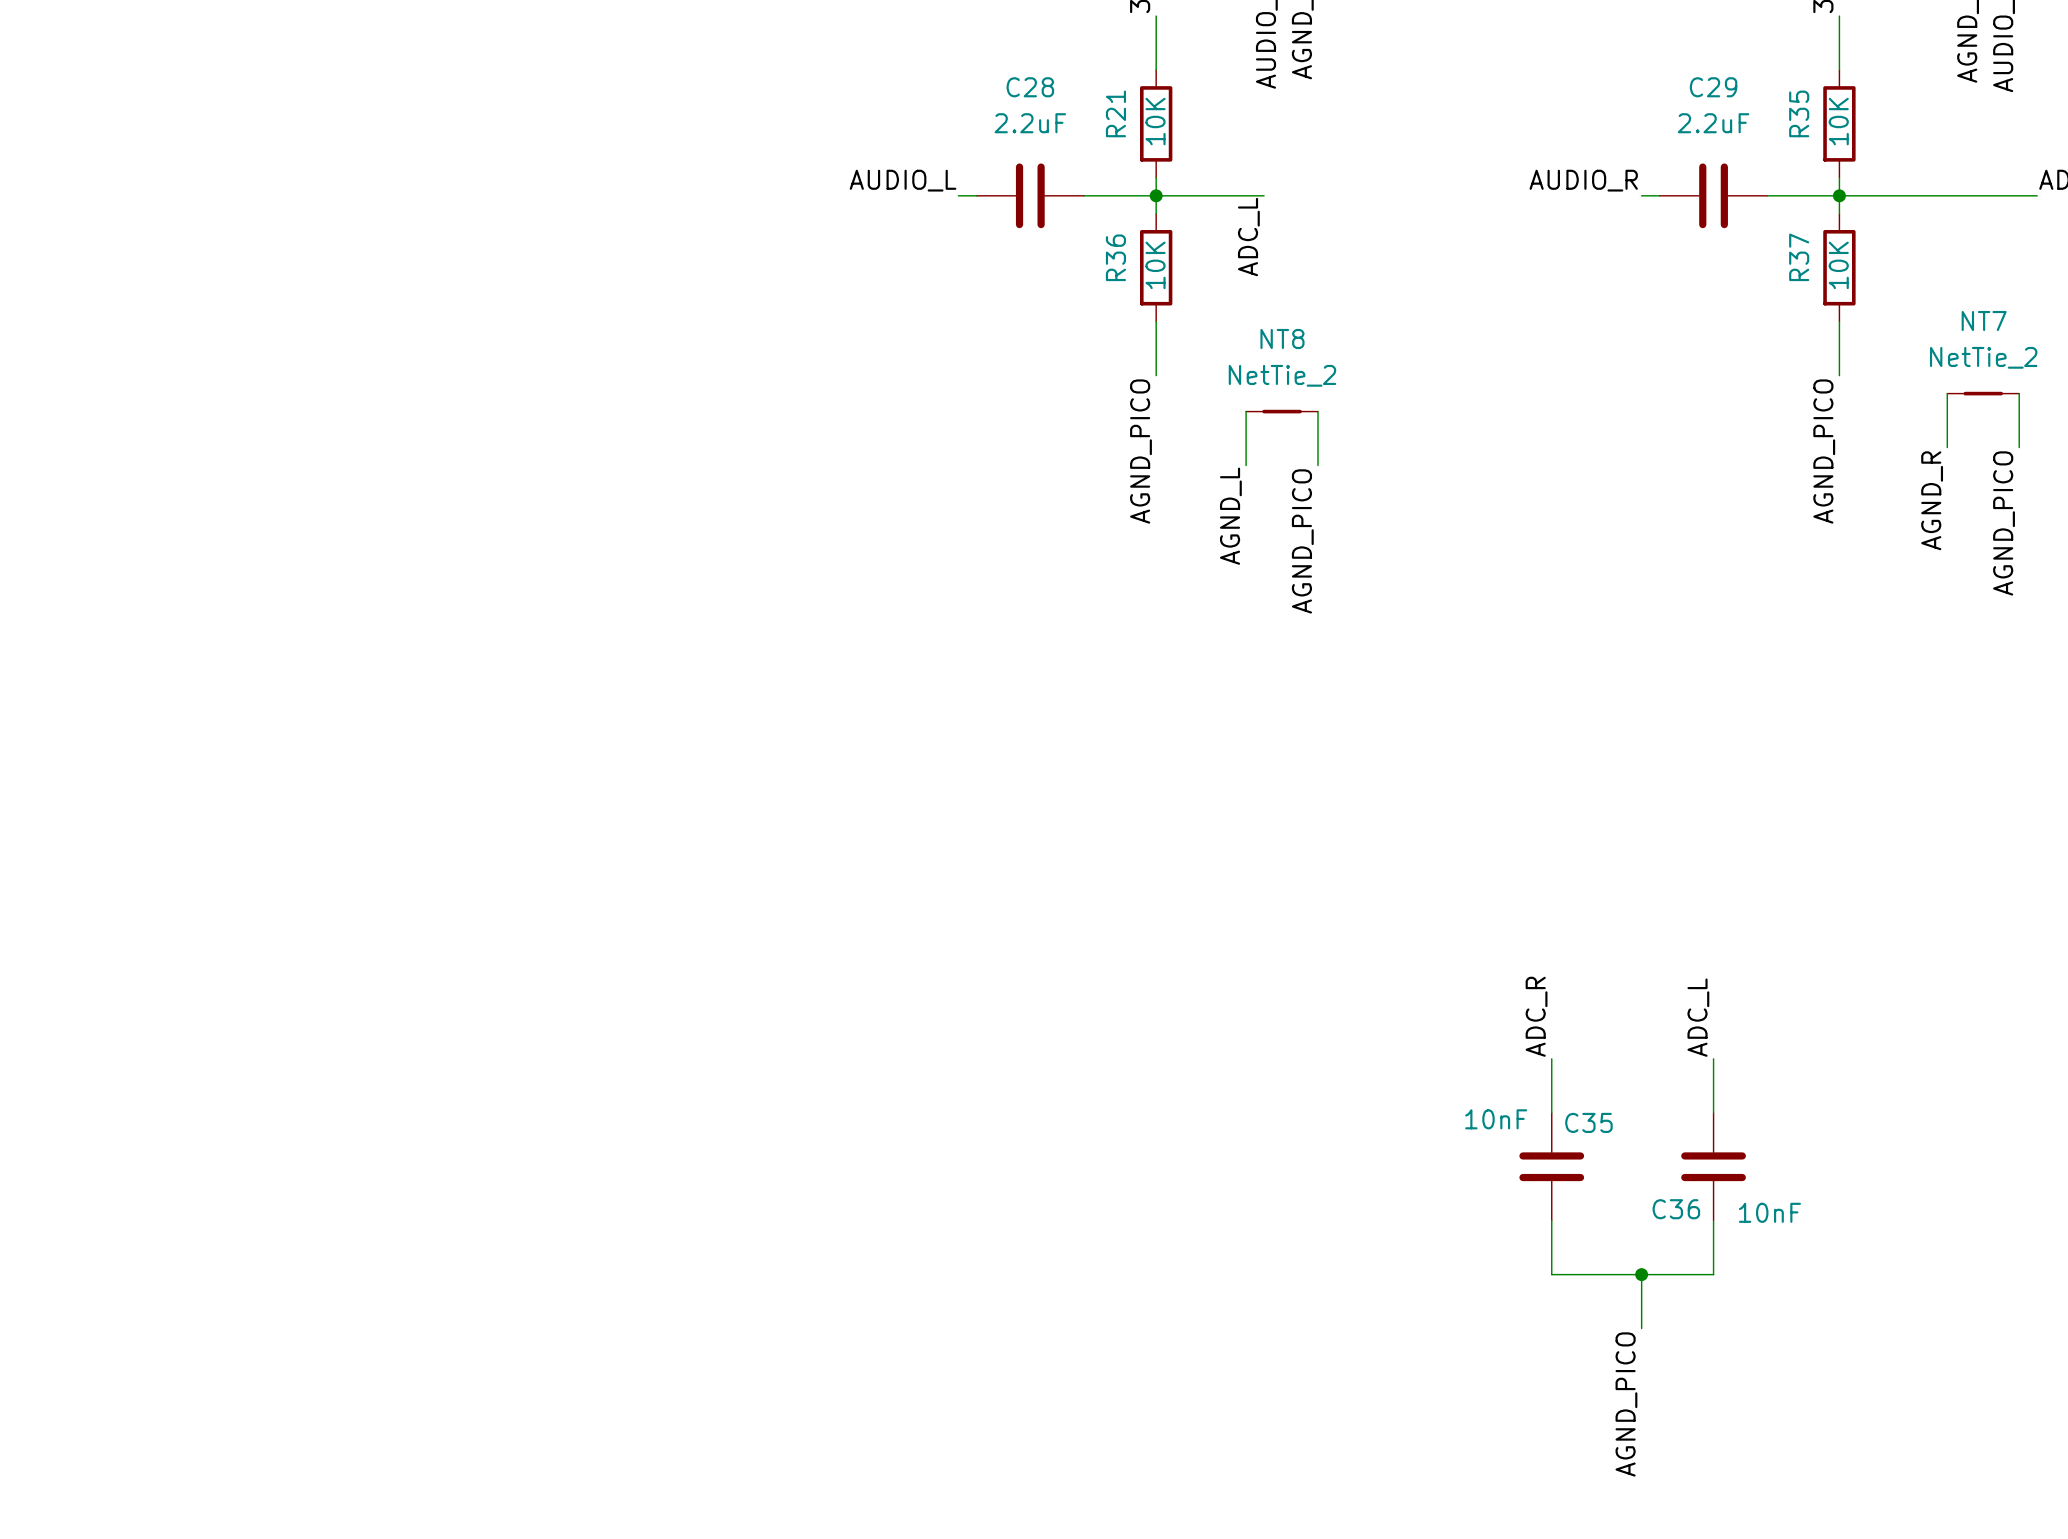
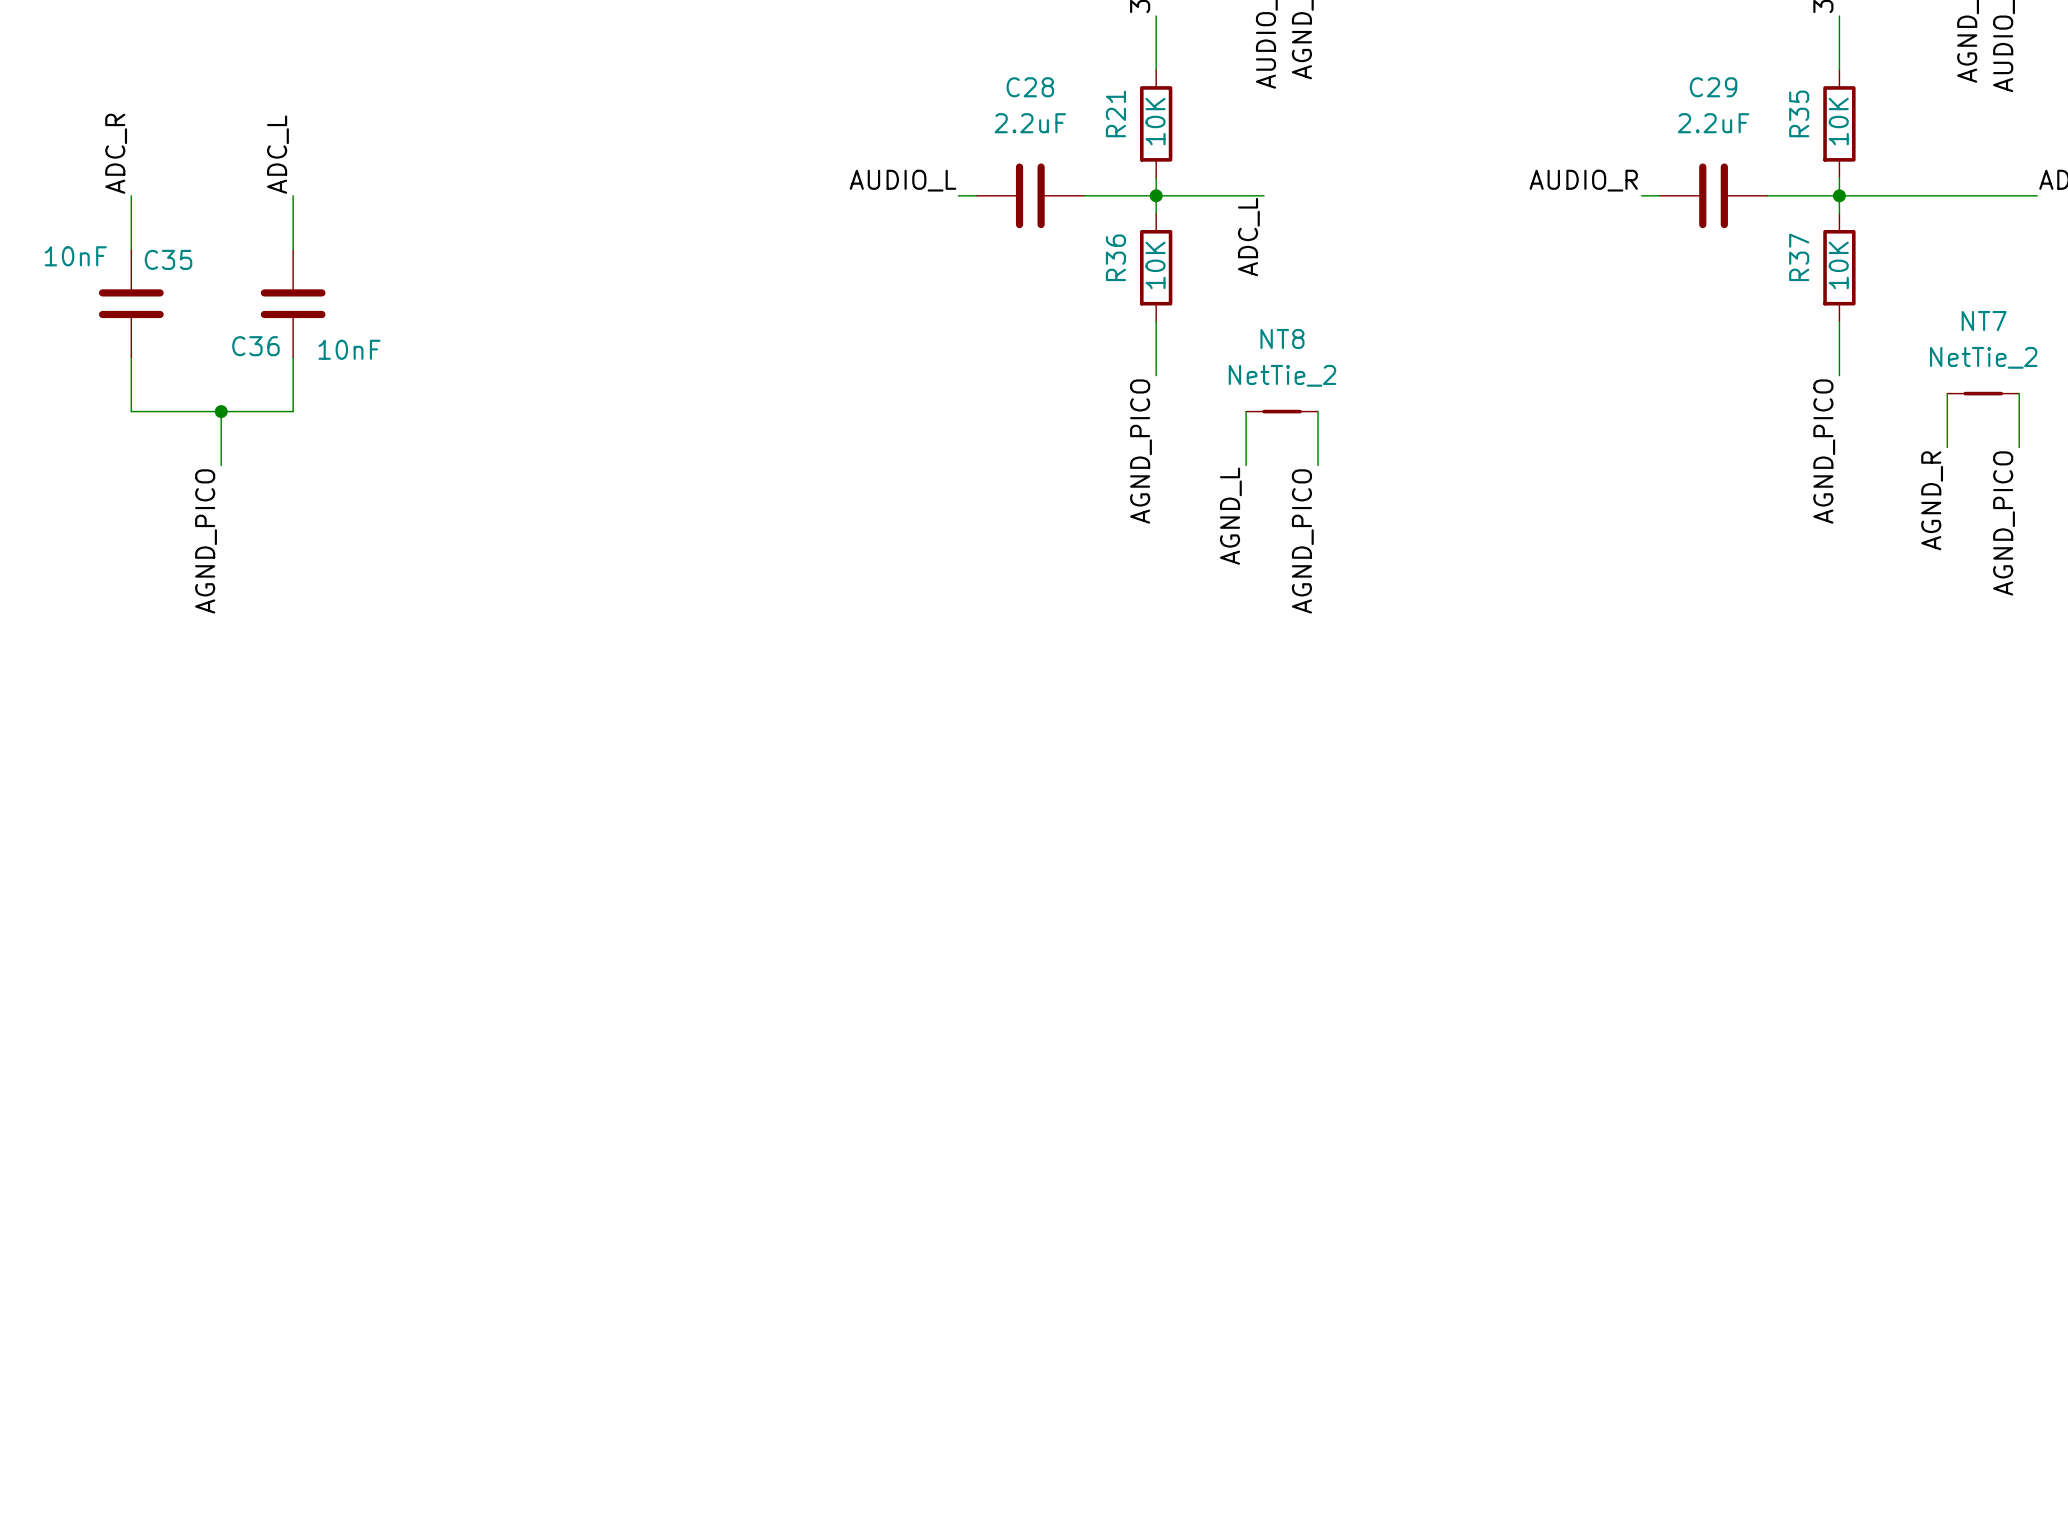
label: none -> ADC_R (116, 153)
label: none -> ADC_L (277, 154)
wire: none -> (131, 195) (131, 249)
wire: none -> (293, 195) (293, 249)
wire: none -> (131, 357) (131, 411) (293, 411) (293, 357)
wire: none -> (221, 411) (221, 465)
junction: none -> (221, 411)
label: none -> AGND_PICO (206, 541)
label: ADC_R (1536, 1016) -> none
label: ADC_L (1698, 1017) -> none
wire: (1551, 1058) (1551, 1112) -> none
wire: (1713, 1058) (1713, 1112) -> none
C35 position: (1551, 1166) -> (131, 303)
C36 position: (1713, 1166) -> (293, 303)
wire: (1551, 1220) (1551, 1274) (1713, 1274) (1713, 1220) -> none
wire: (1641, 1274) (1641, 1328) -> none
junction: (1641, 1274) -> none
label: AGND_PICO (1626, 1404) -> none

